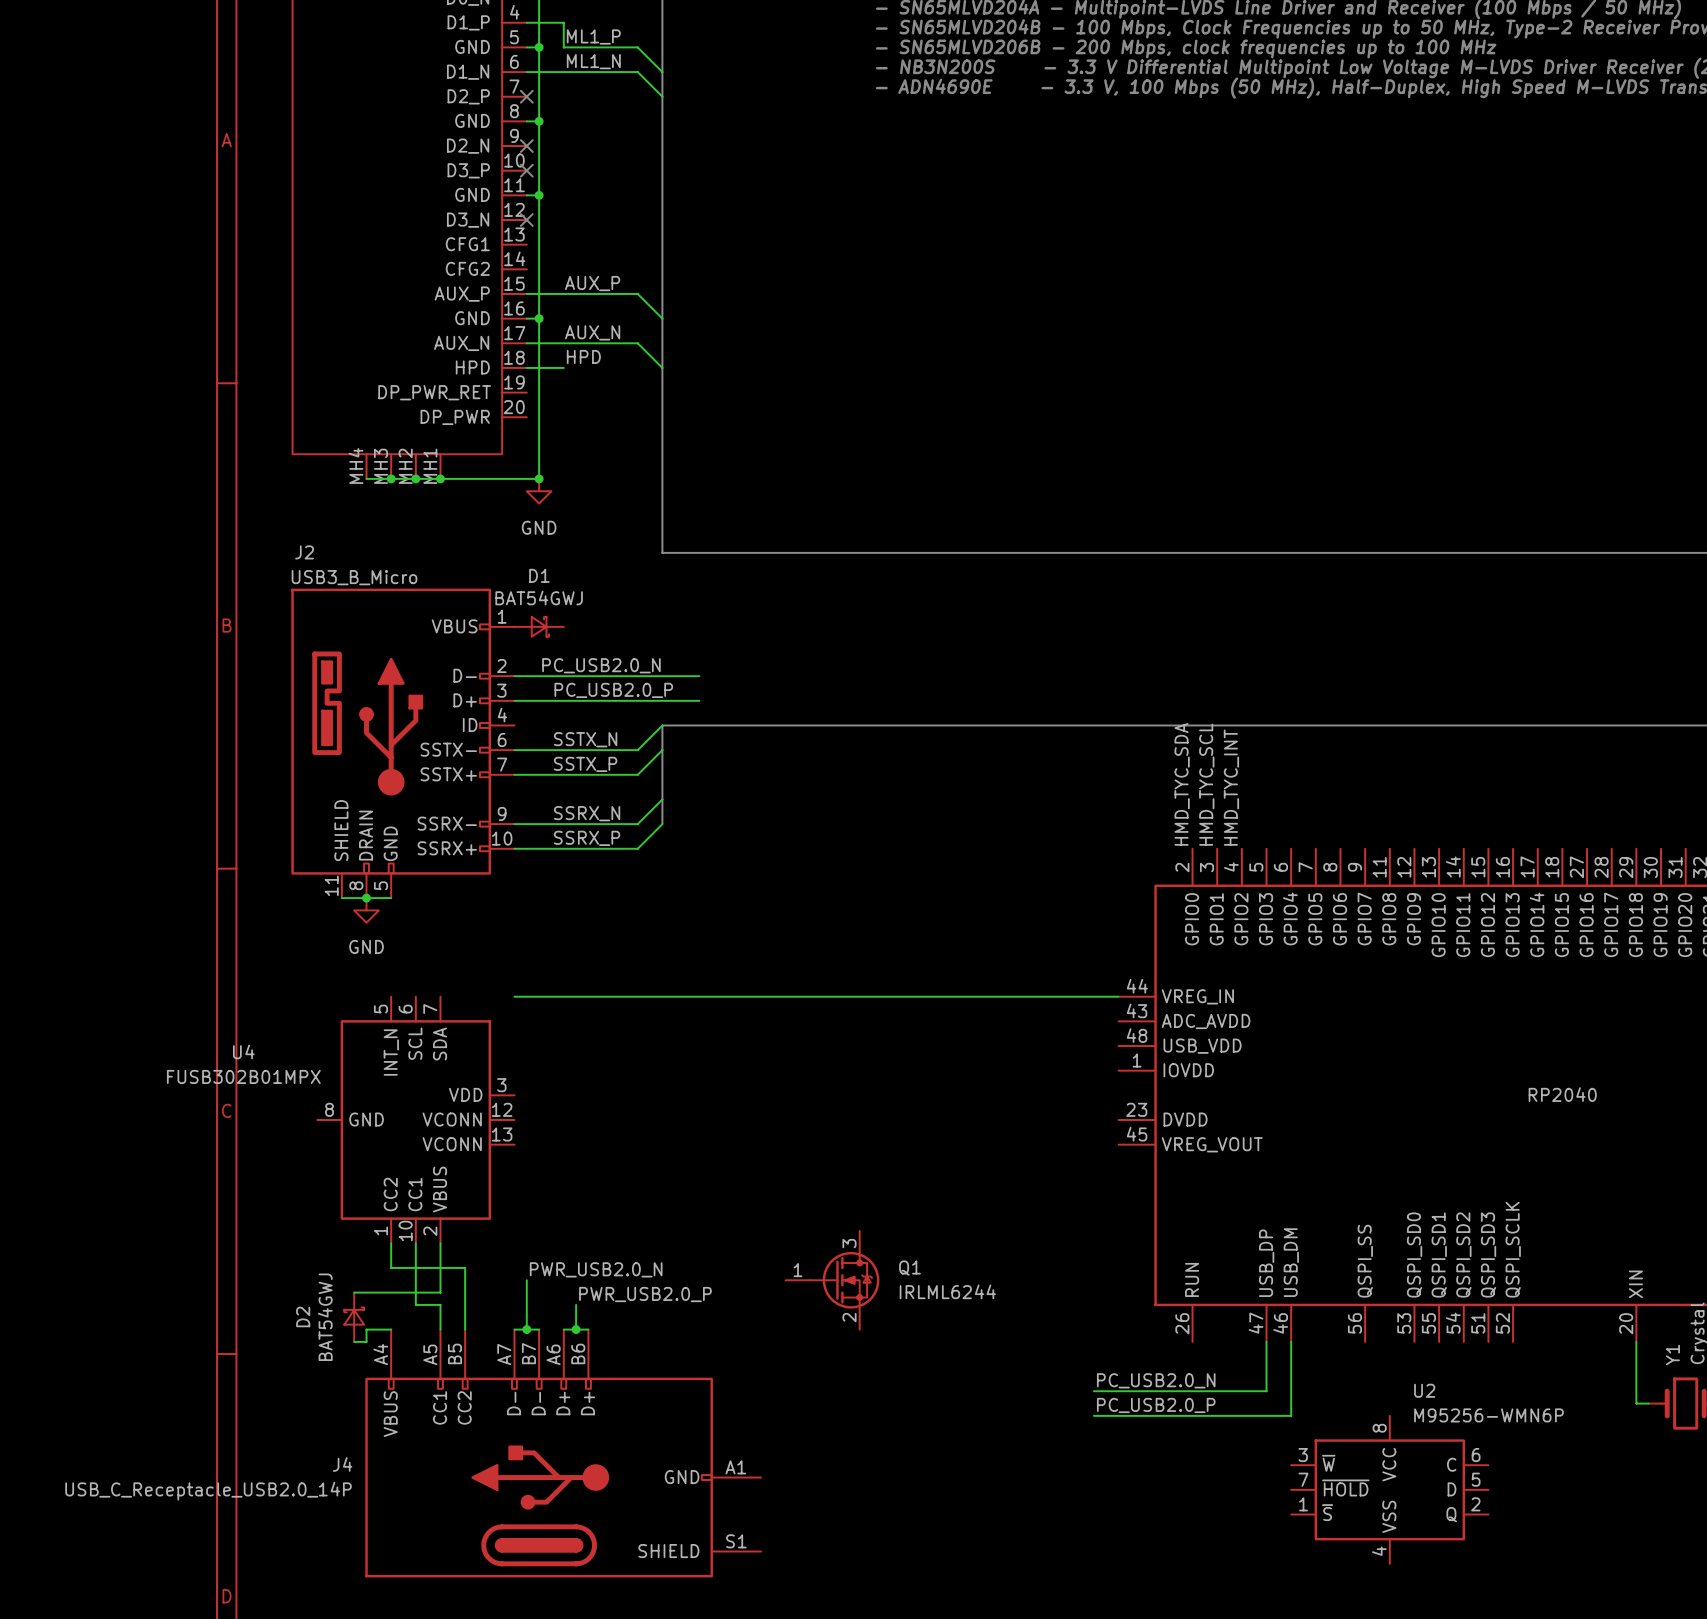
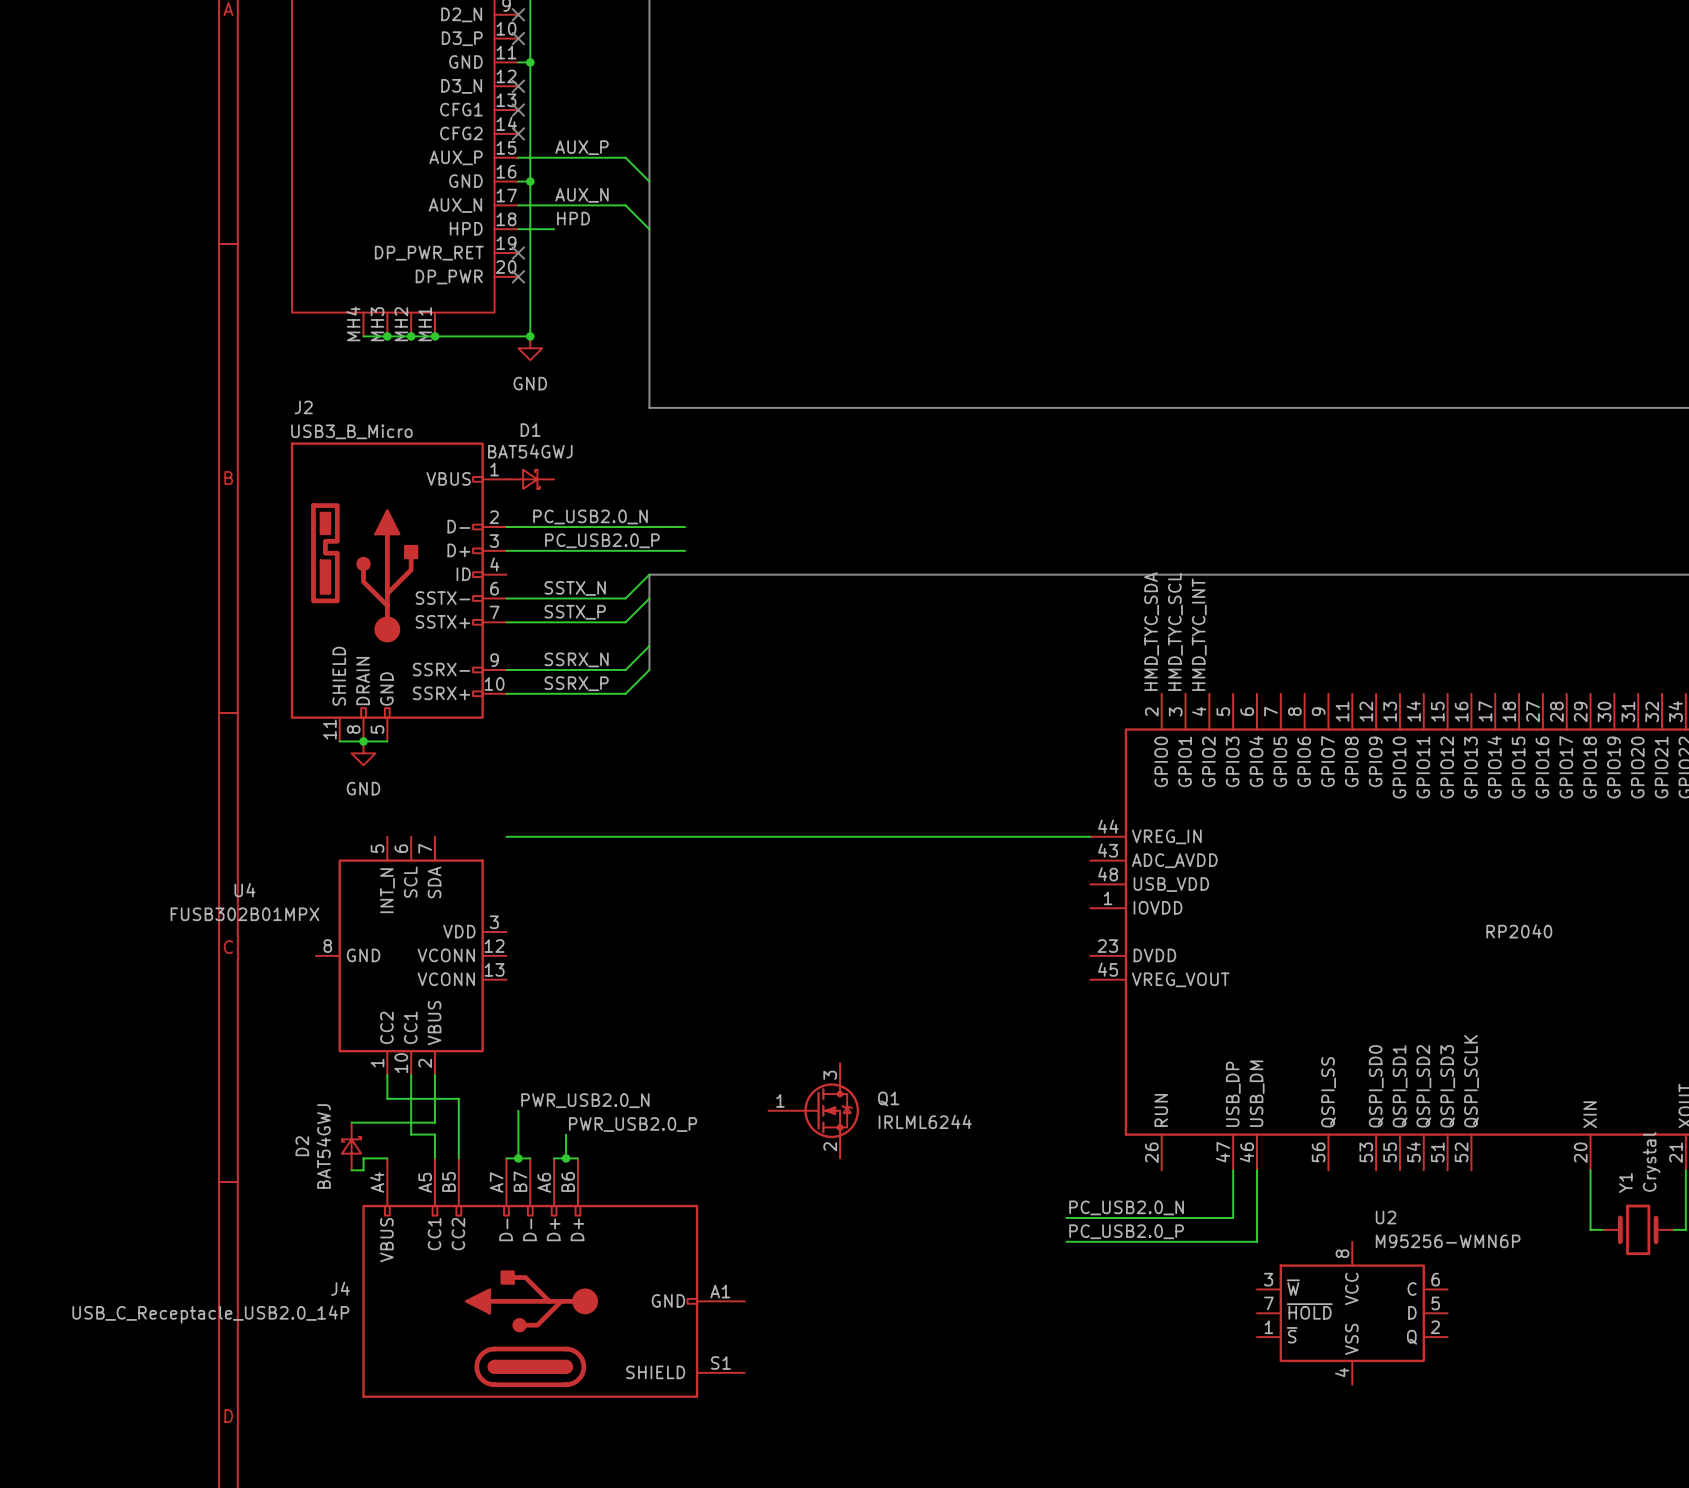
no-connect mark: none -> (518, 110)
no-connect mark: none -> (518, 133)
no-connect mark: none -> (518, 253)
no-connect mark: none -> (518, 276)

